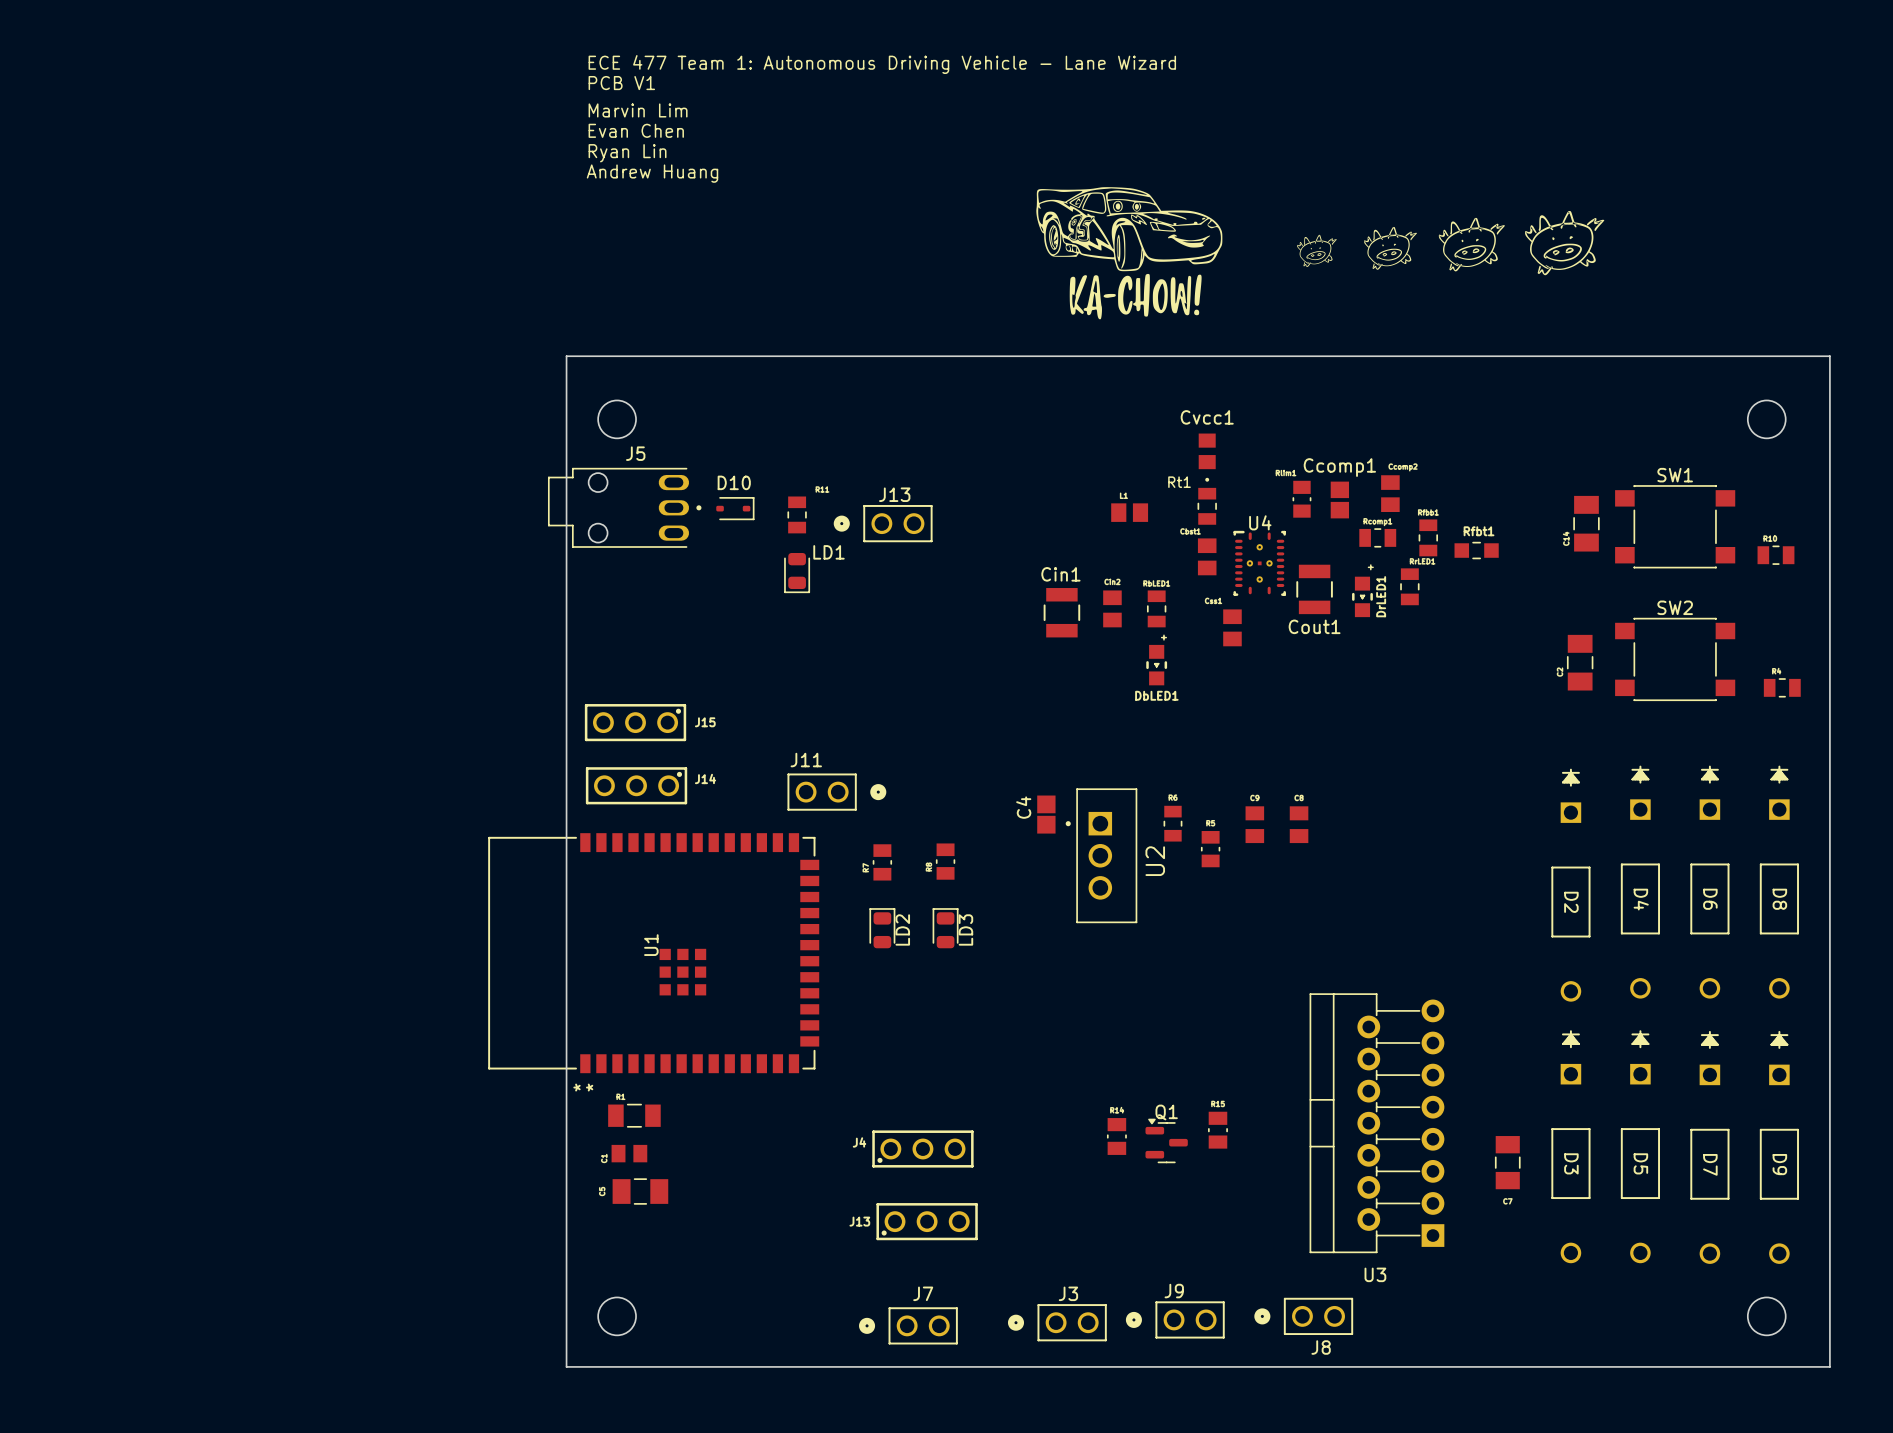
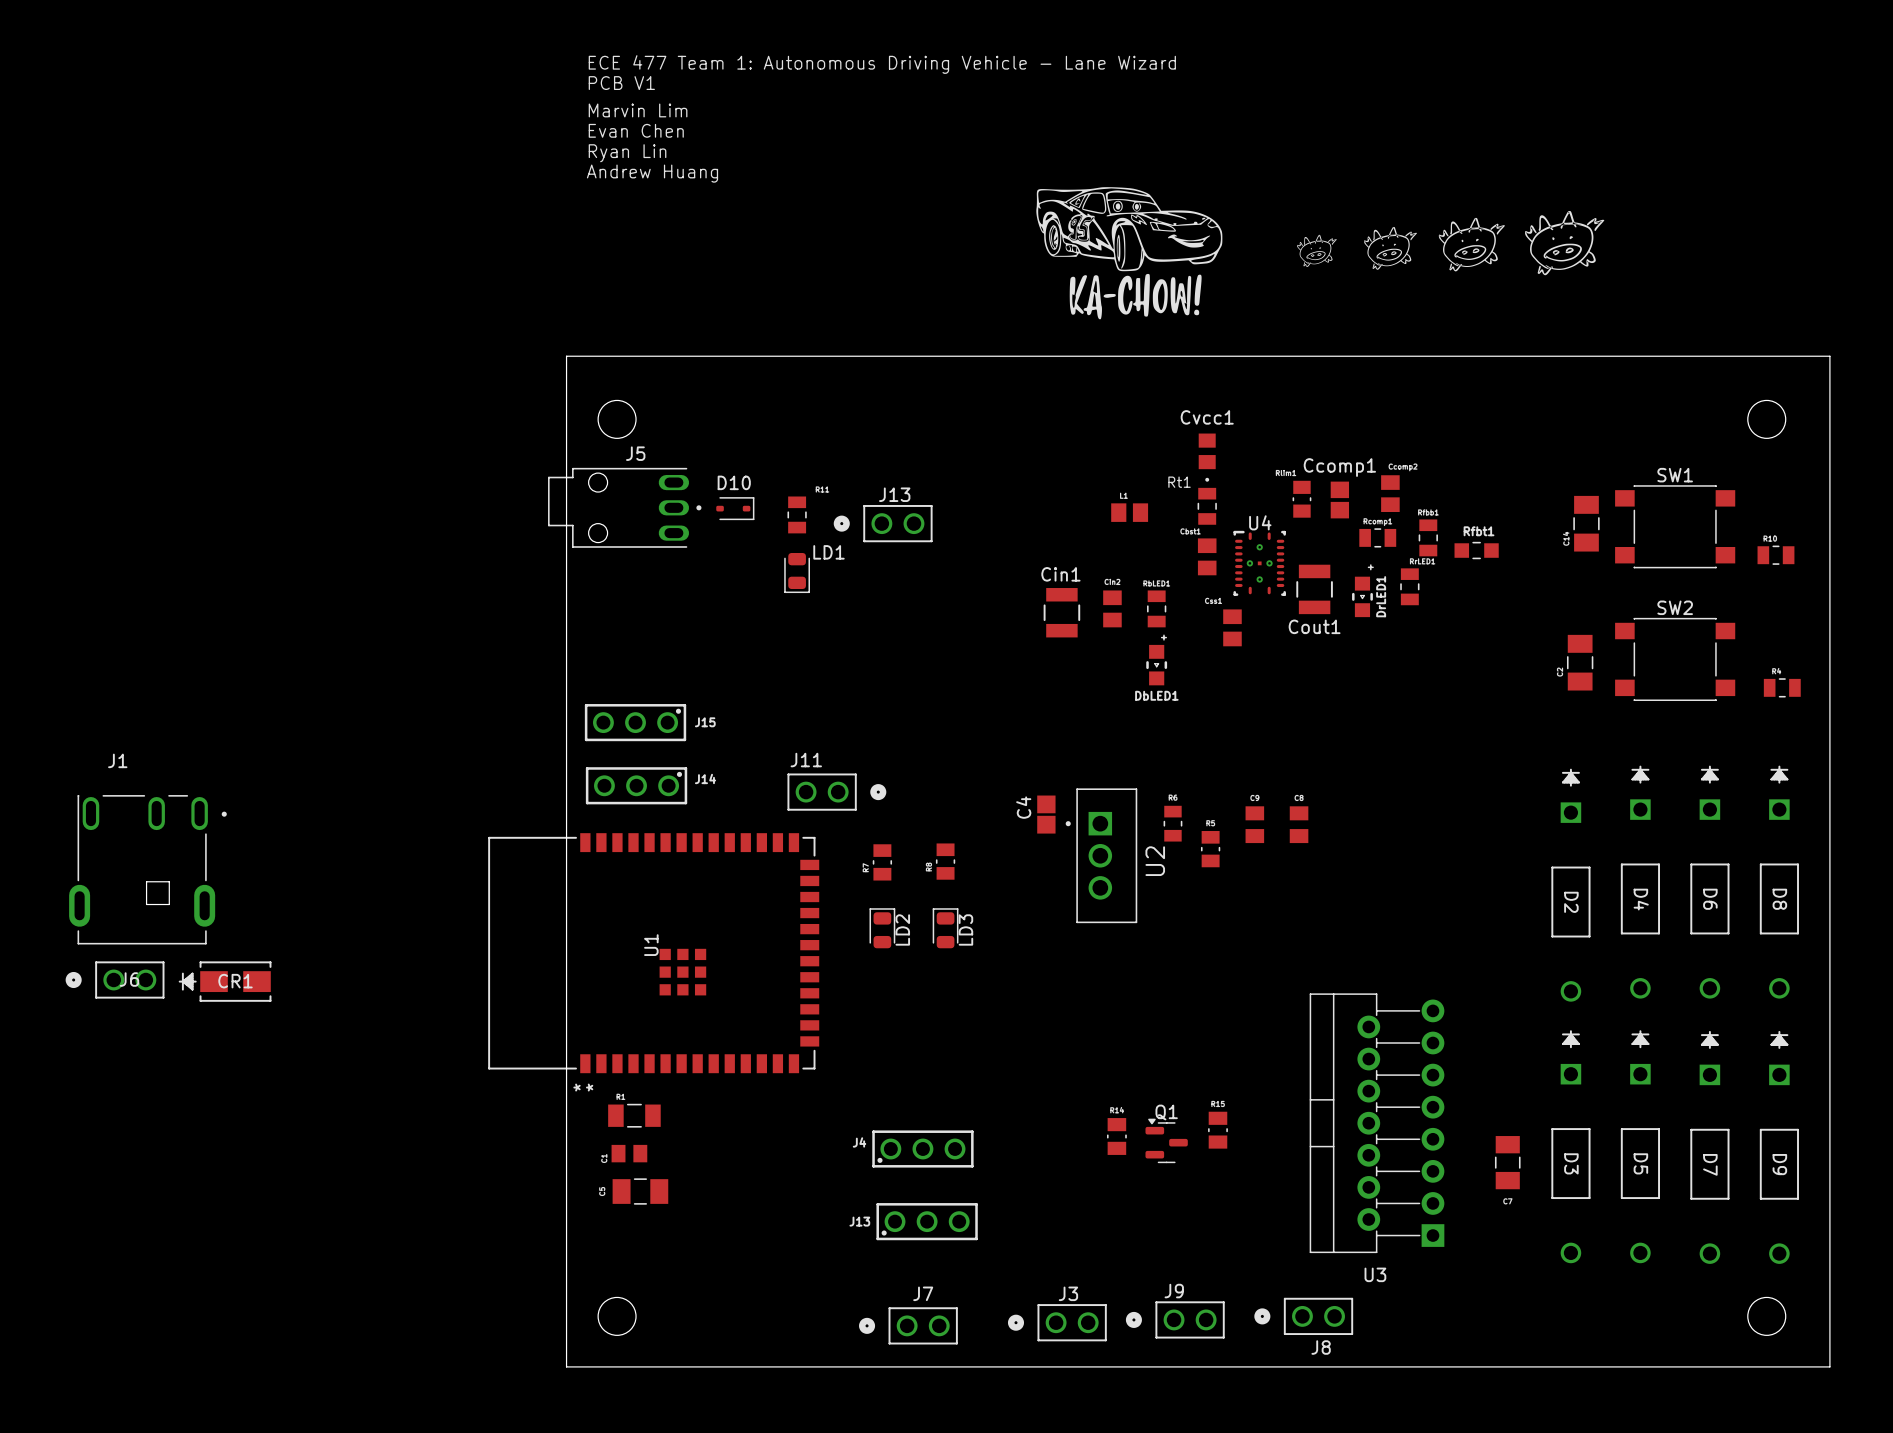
J1: none -> (147, 869)
J6: none -> (115, 979)
CR1: none -> (225, 981)

